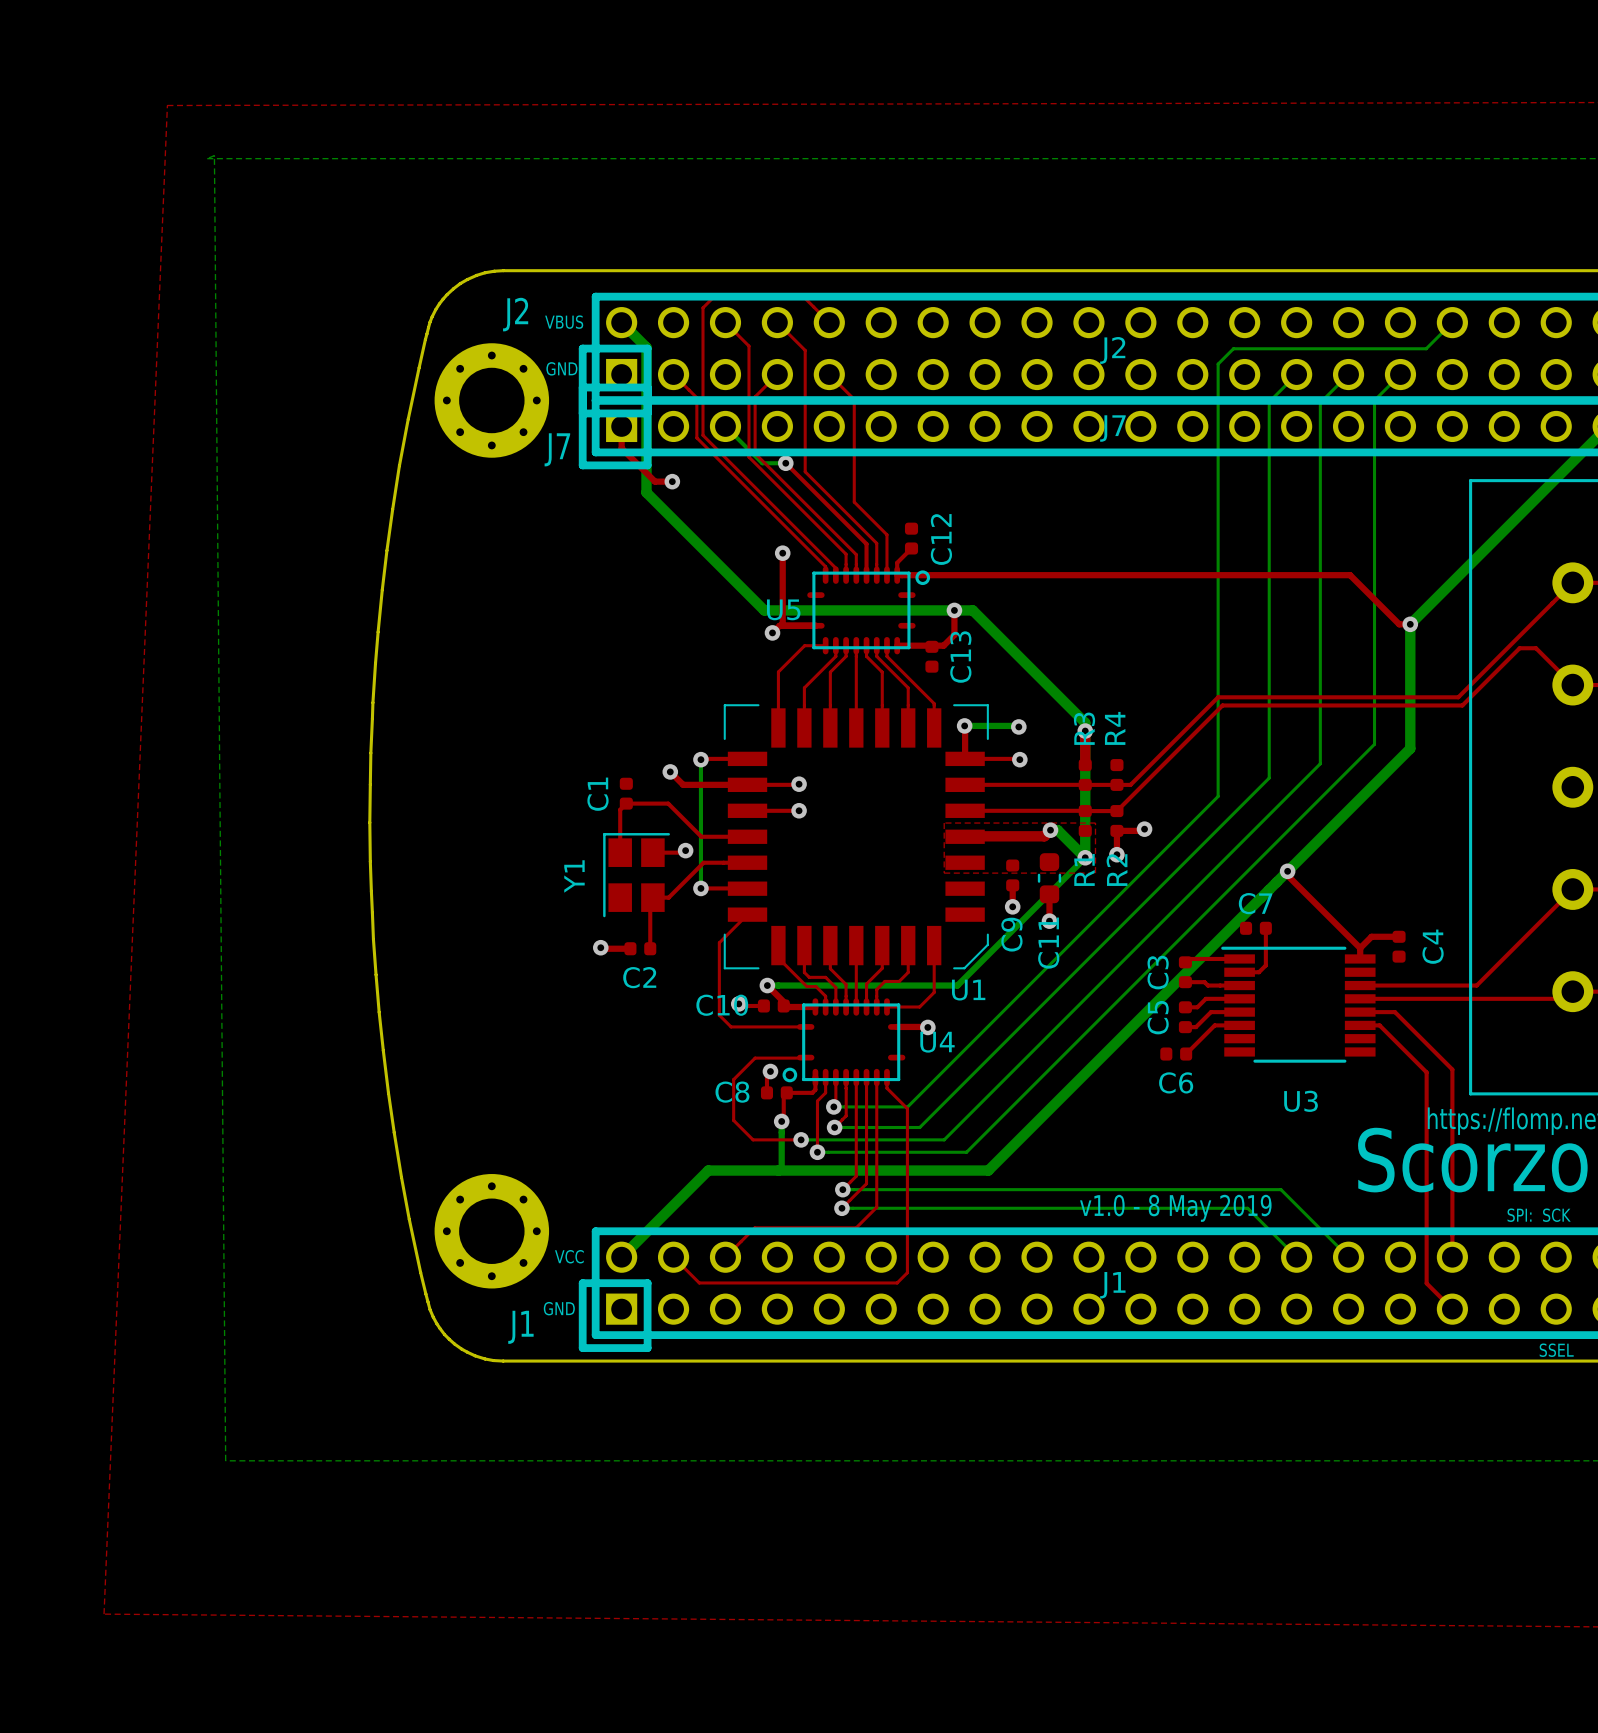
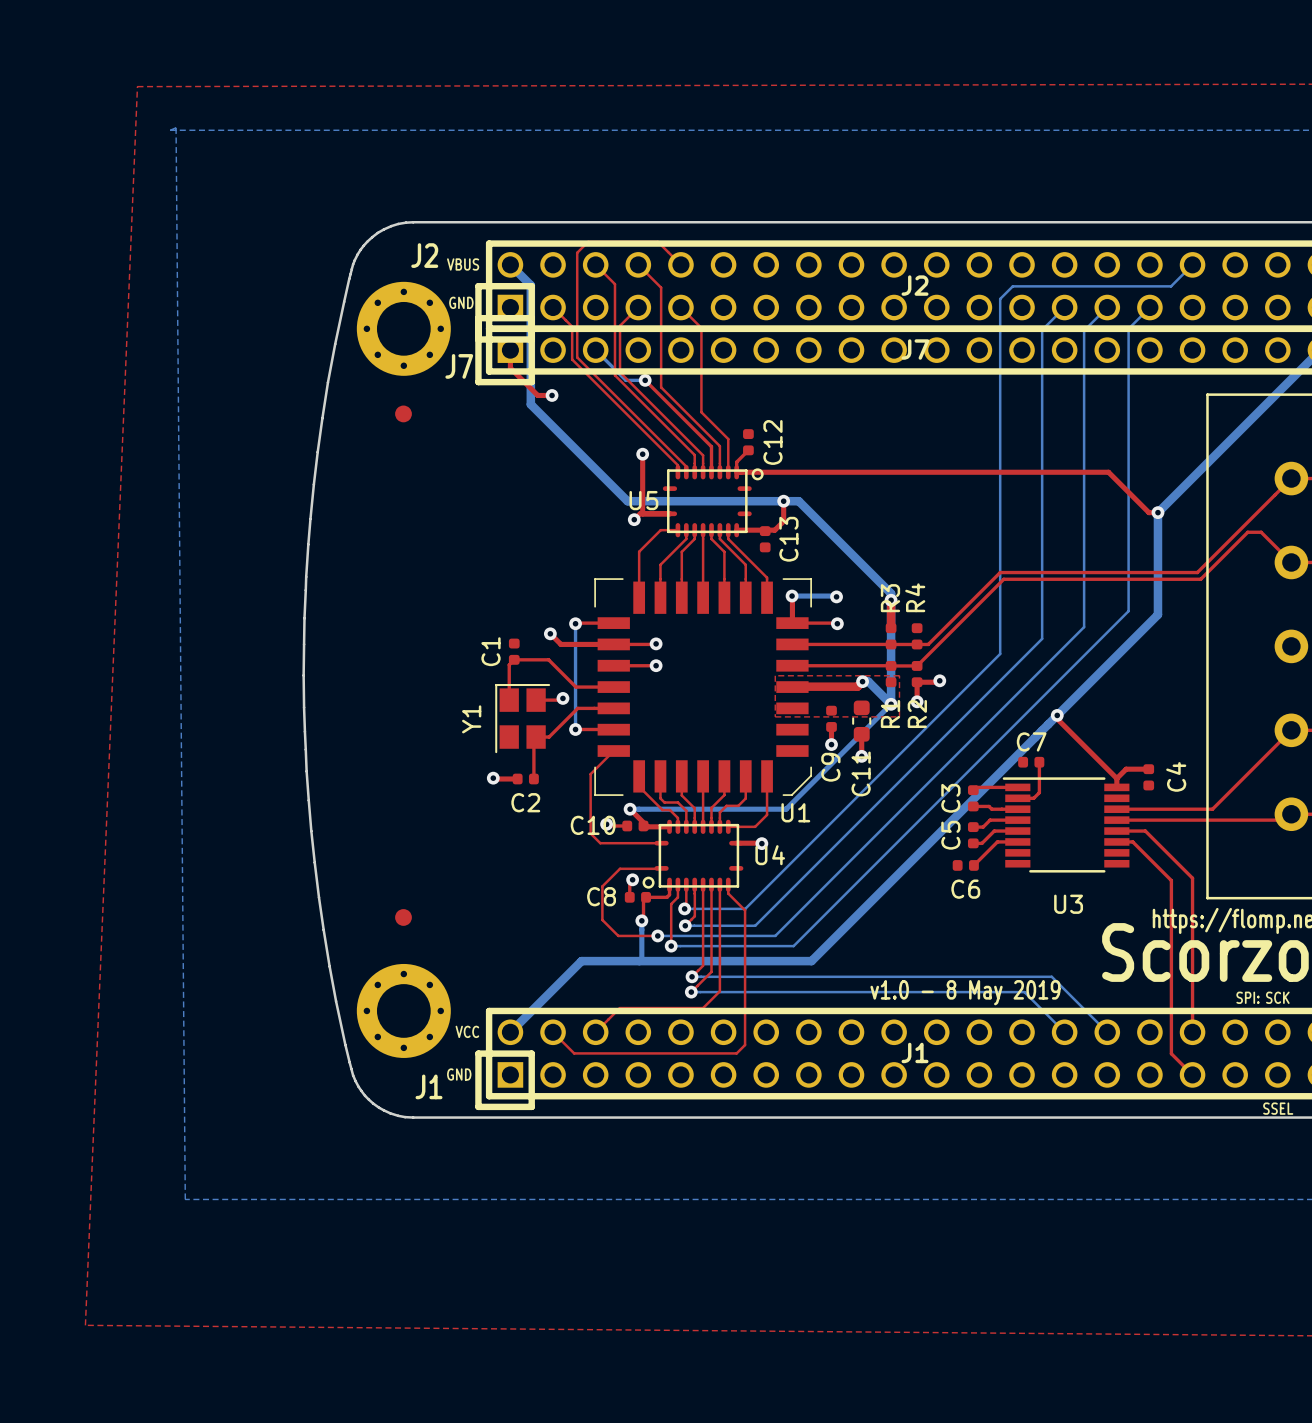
part: none -> (403, 413)
part: none -> (403, 917)

